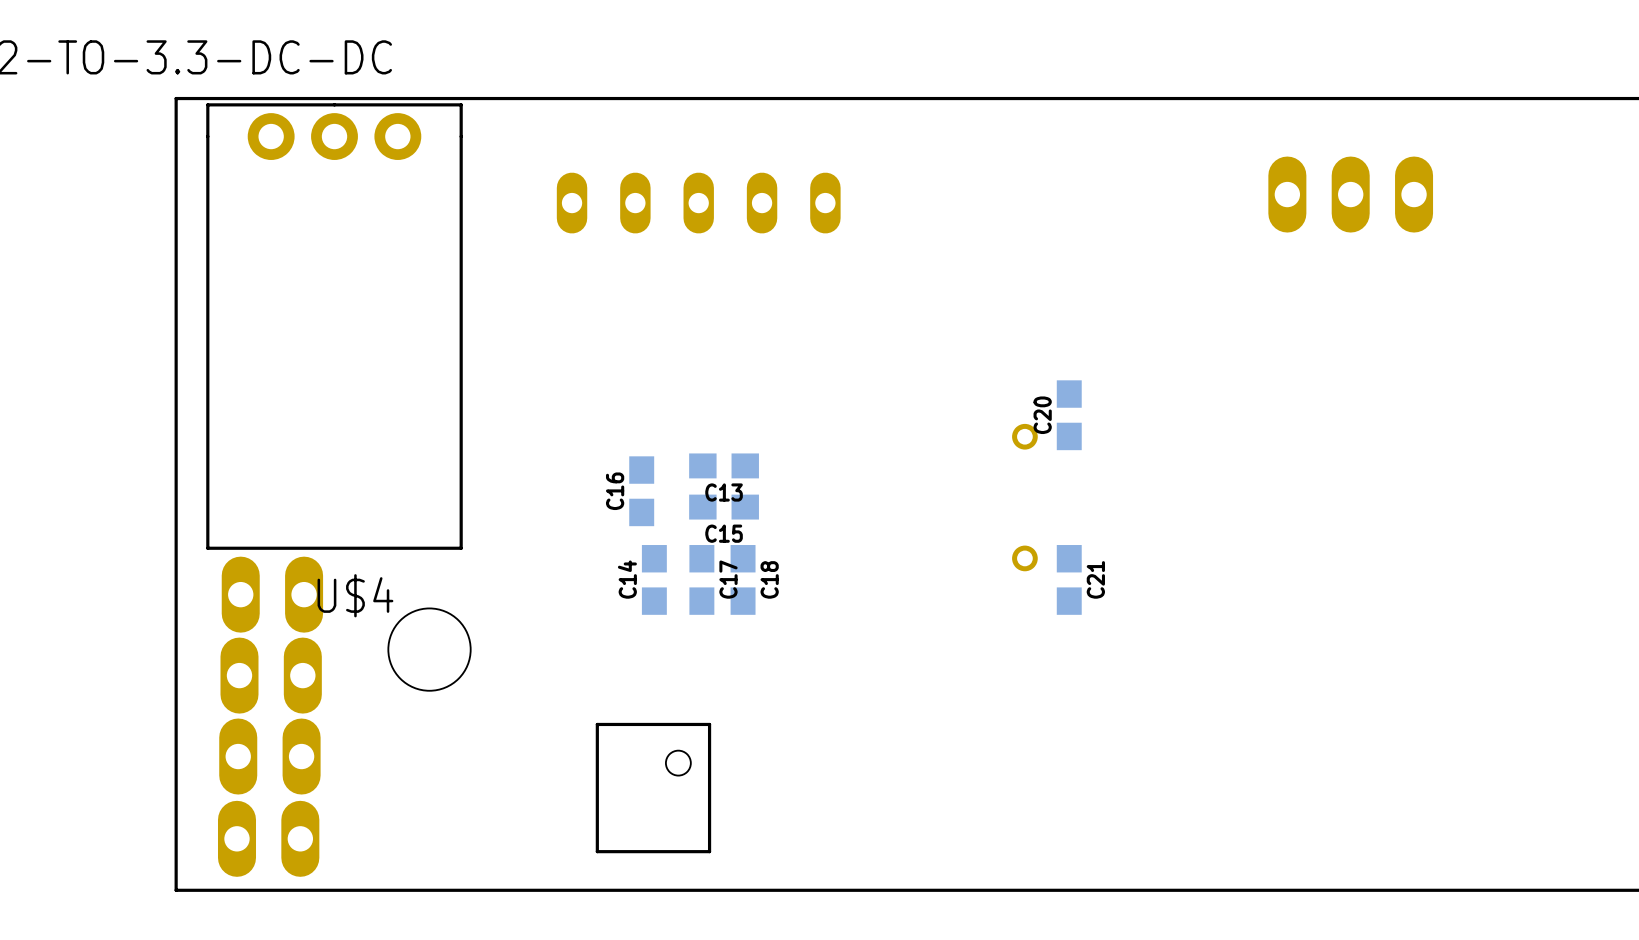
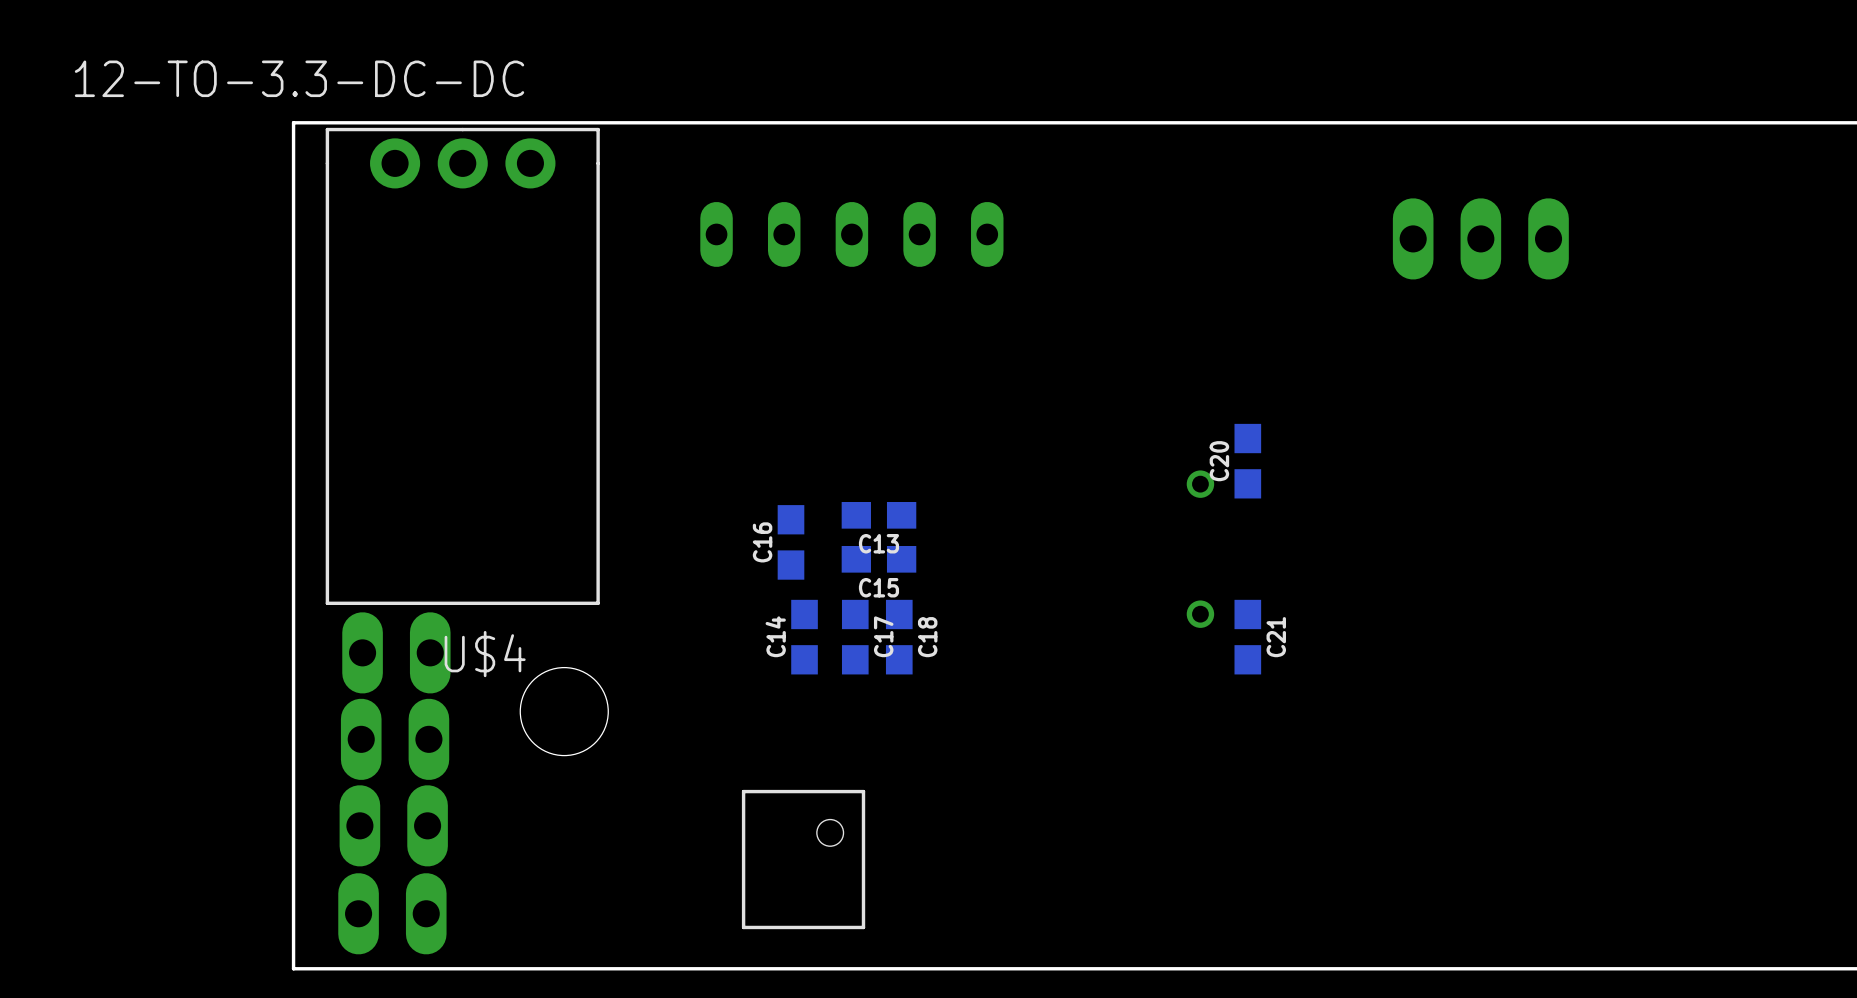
part position: (1350, 194) -> (1480, 238)

